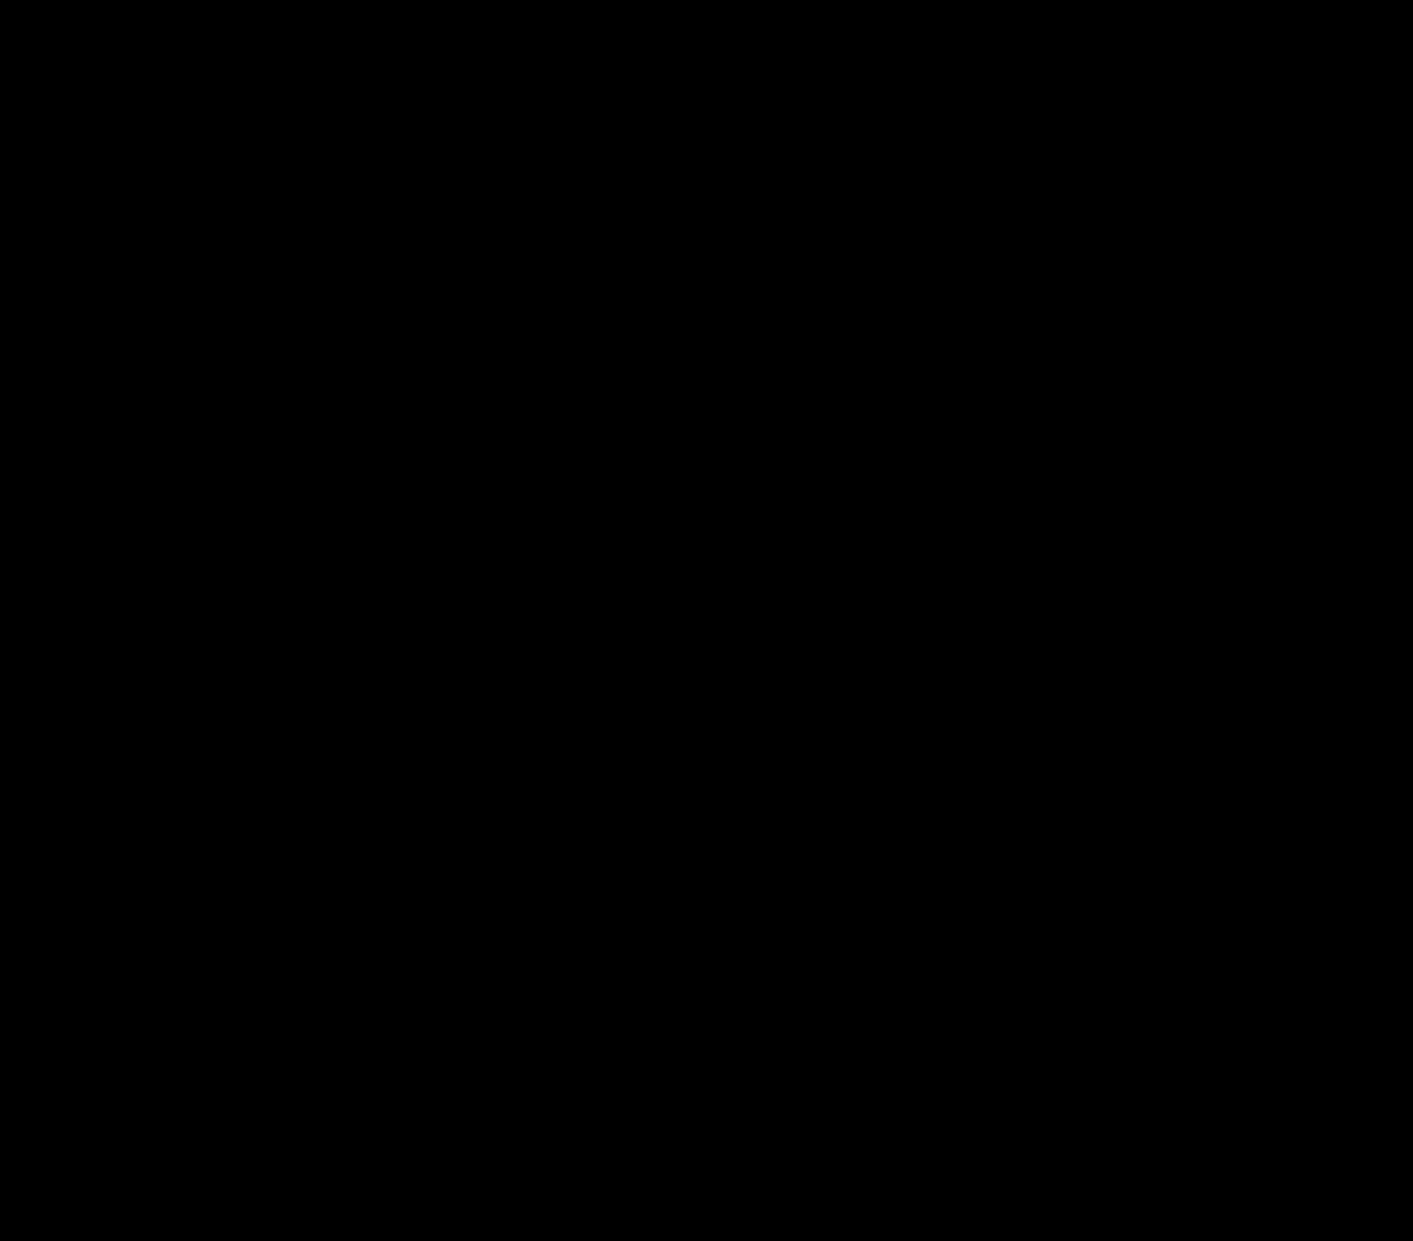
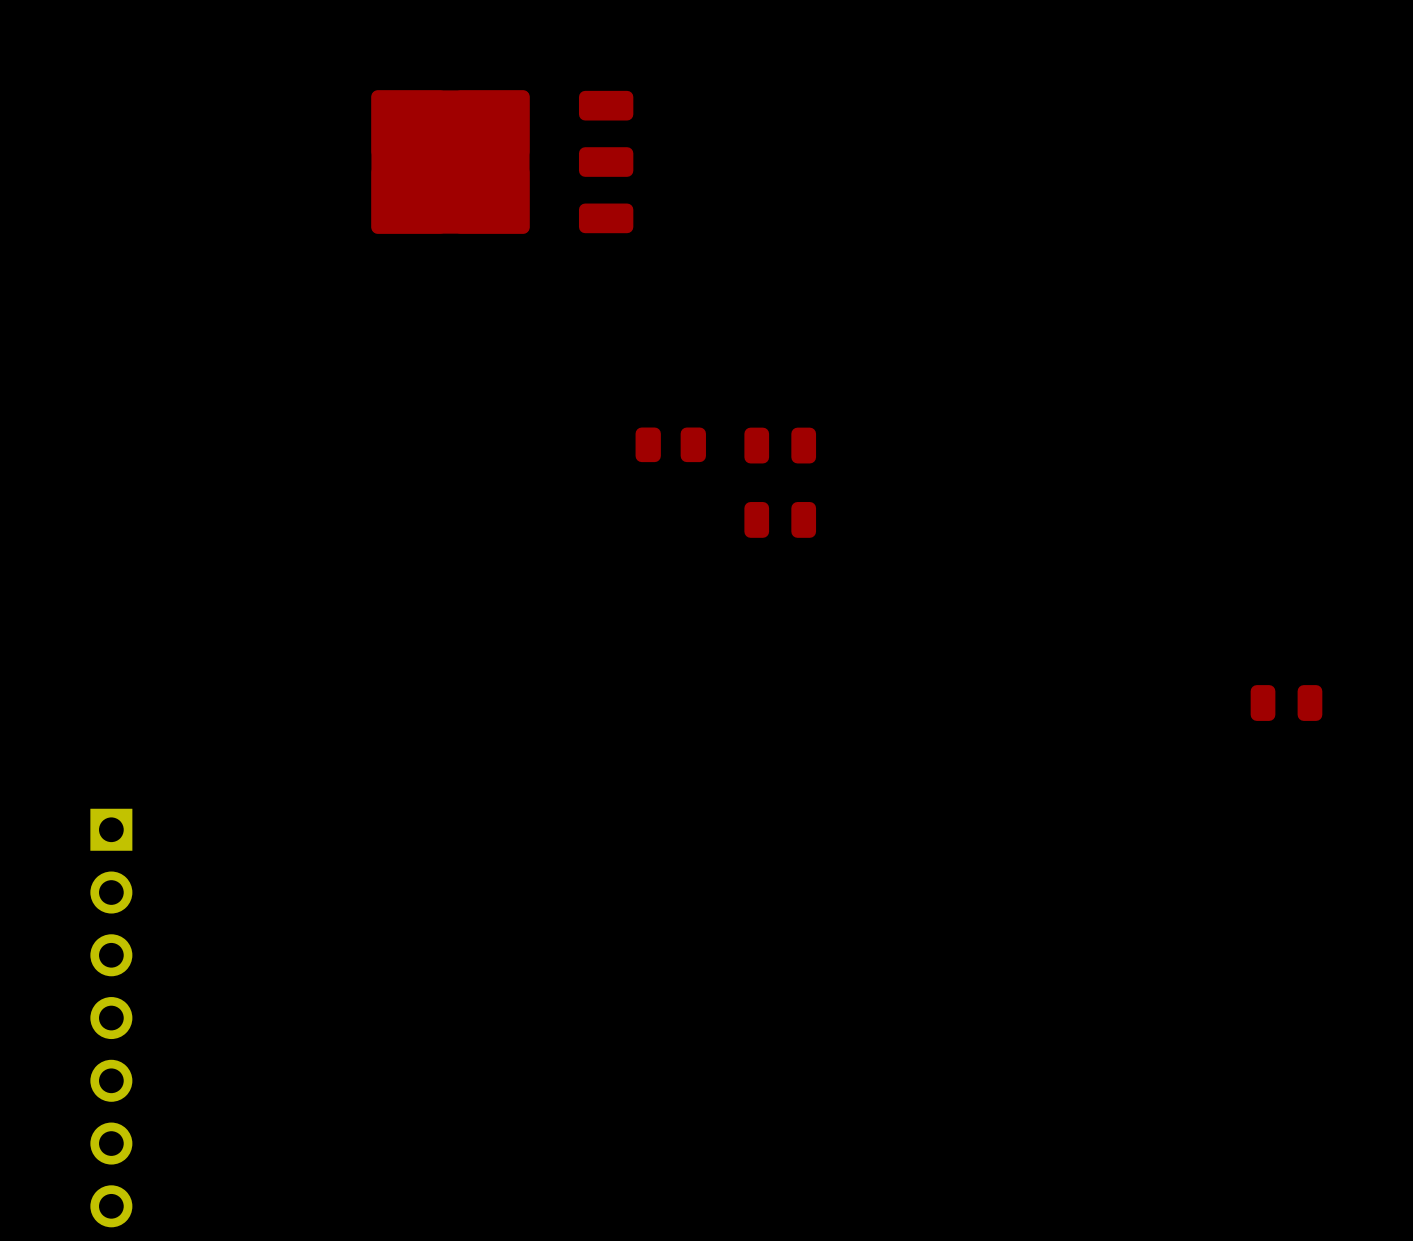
part: none -> (502, 162)
part: none -> (670, 444)
part: none -> (780, 445)
part: none -> (780, 519)
part: none -> (1286, 703)
part: none -> (111, 1018)

